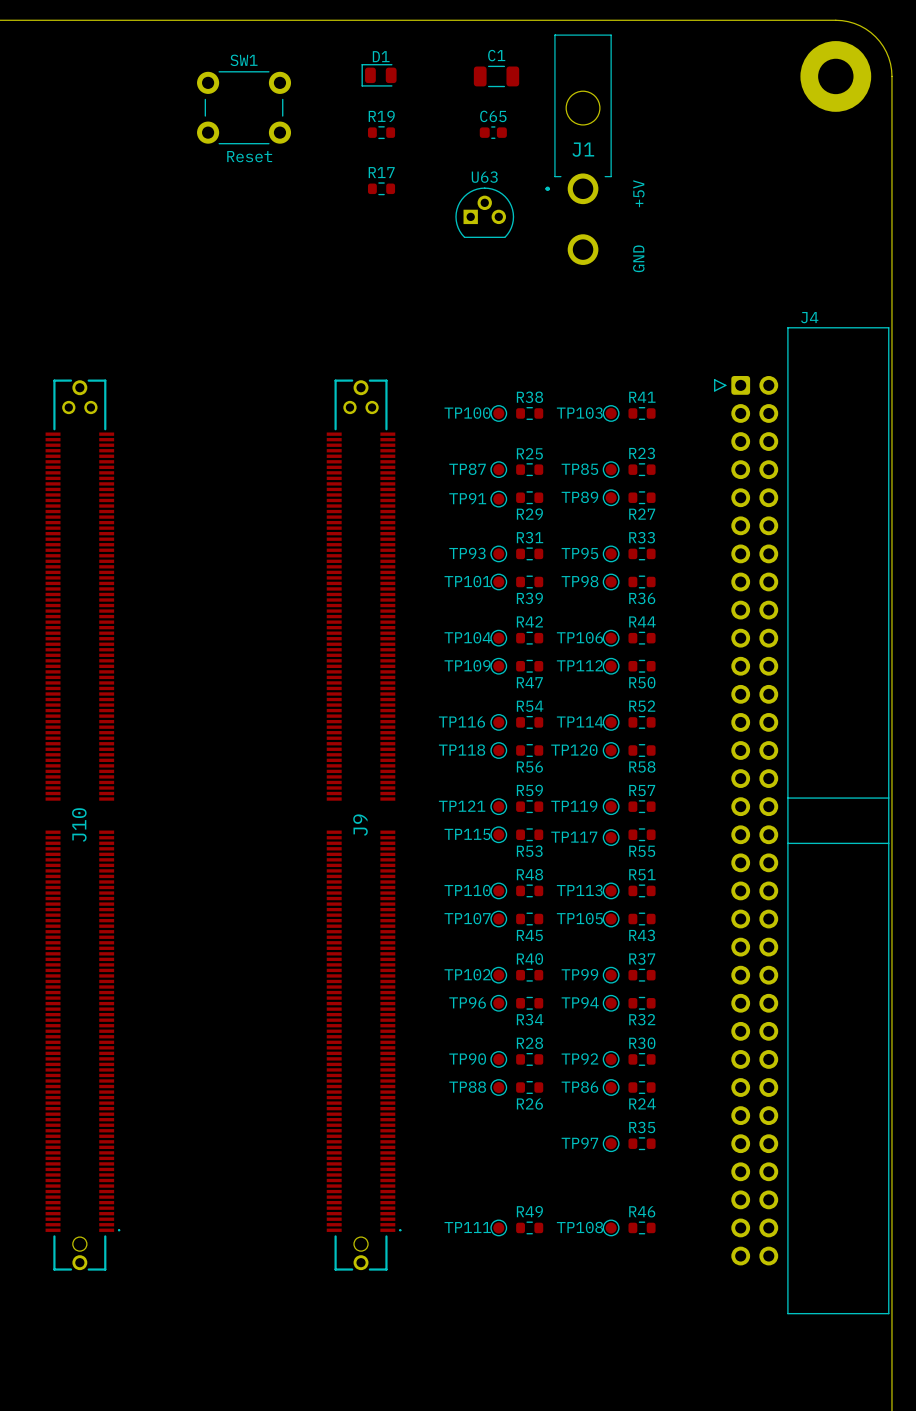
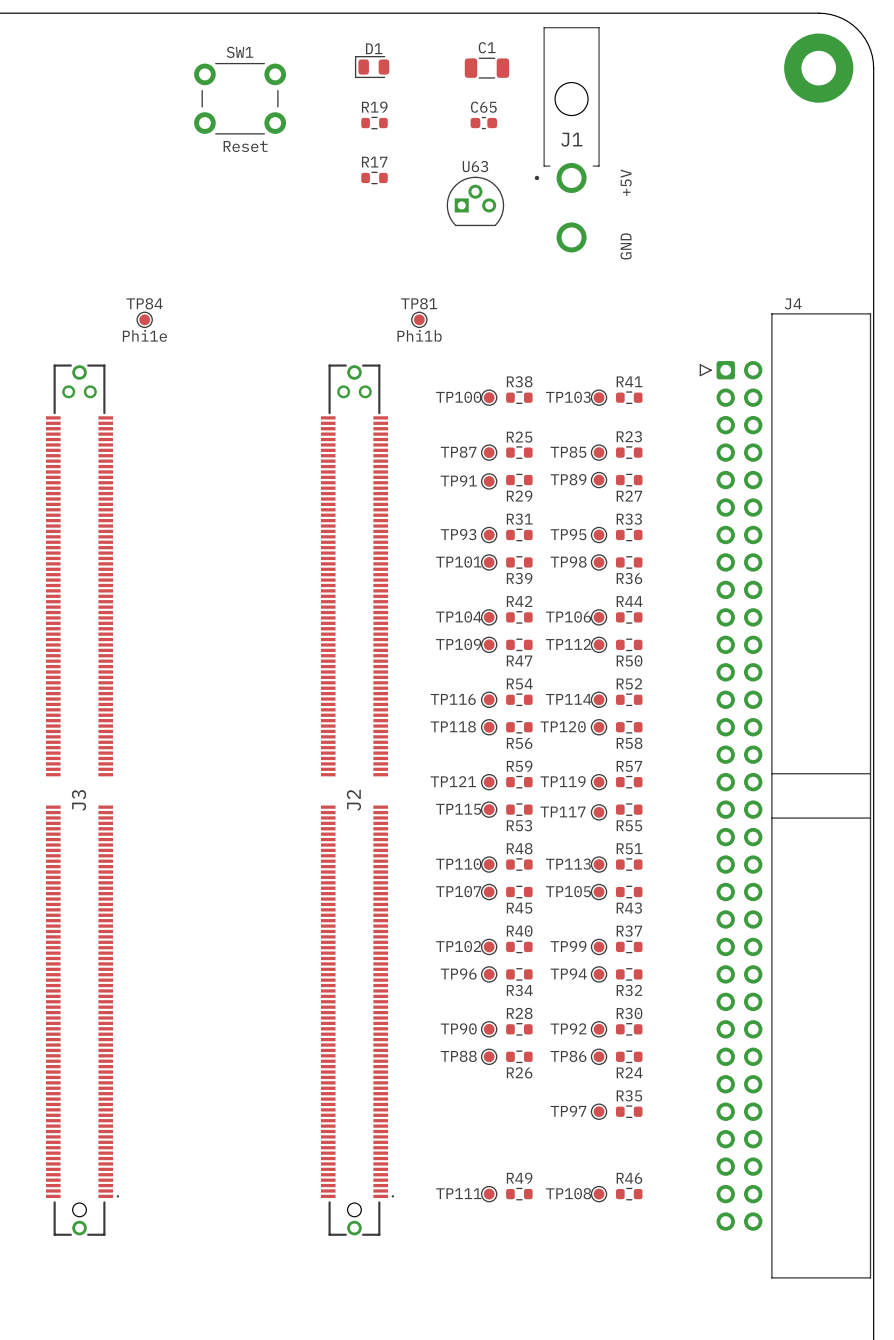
TP84: none -> Phi1e (144, 319)
TP81: none -> Phi1b (419, 319)
J10 name: J10 (79, 825) -> J3 (79, 800)
J9 name: J9 (360, 825) -> J2 (353, 800)

